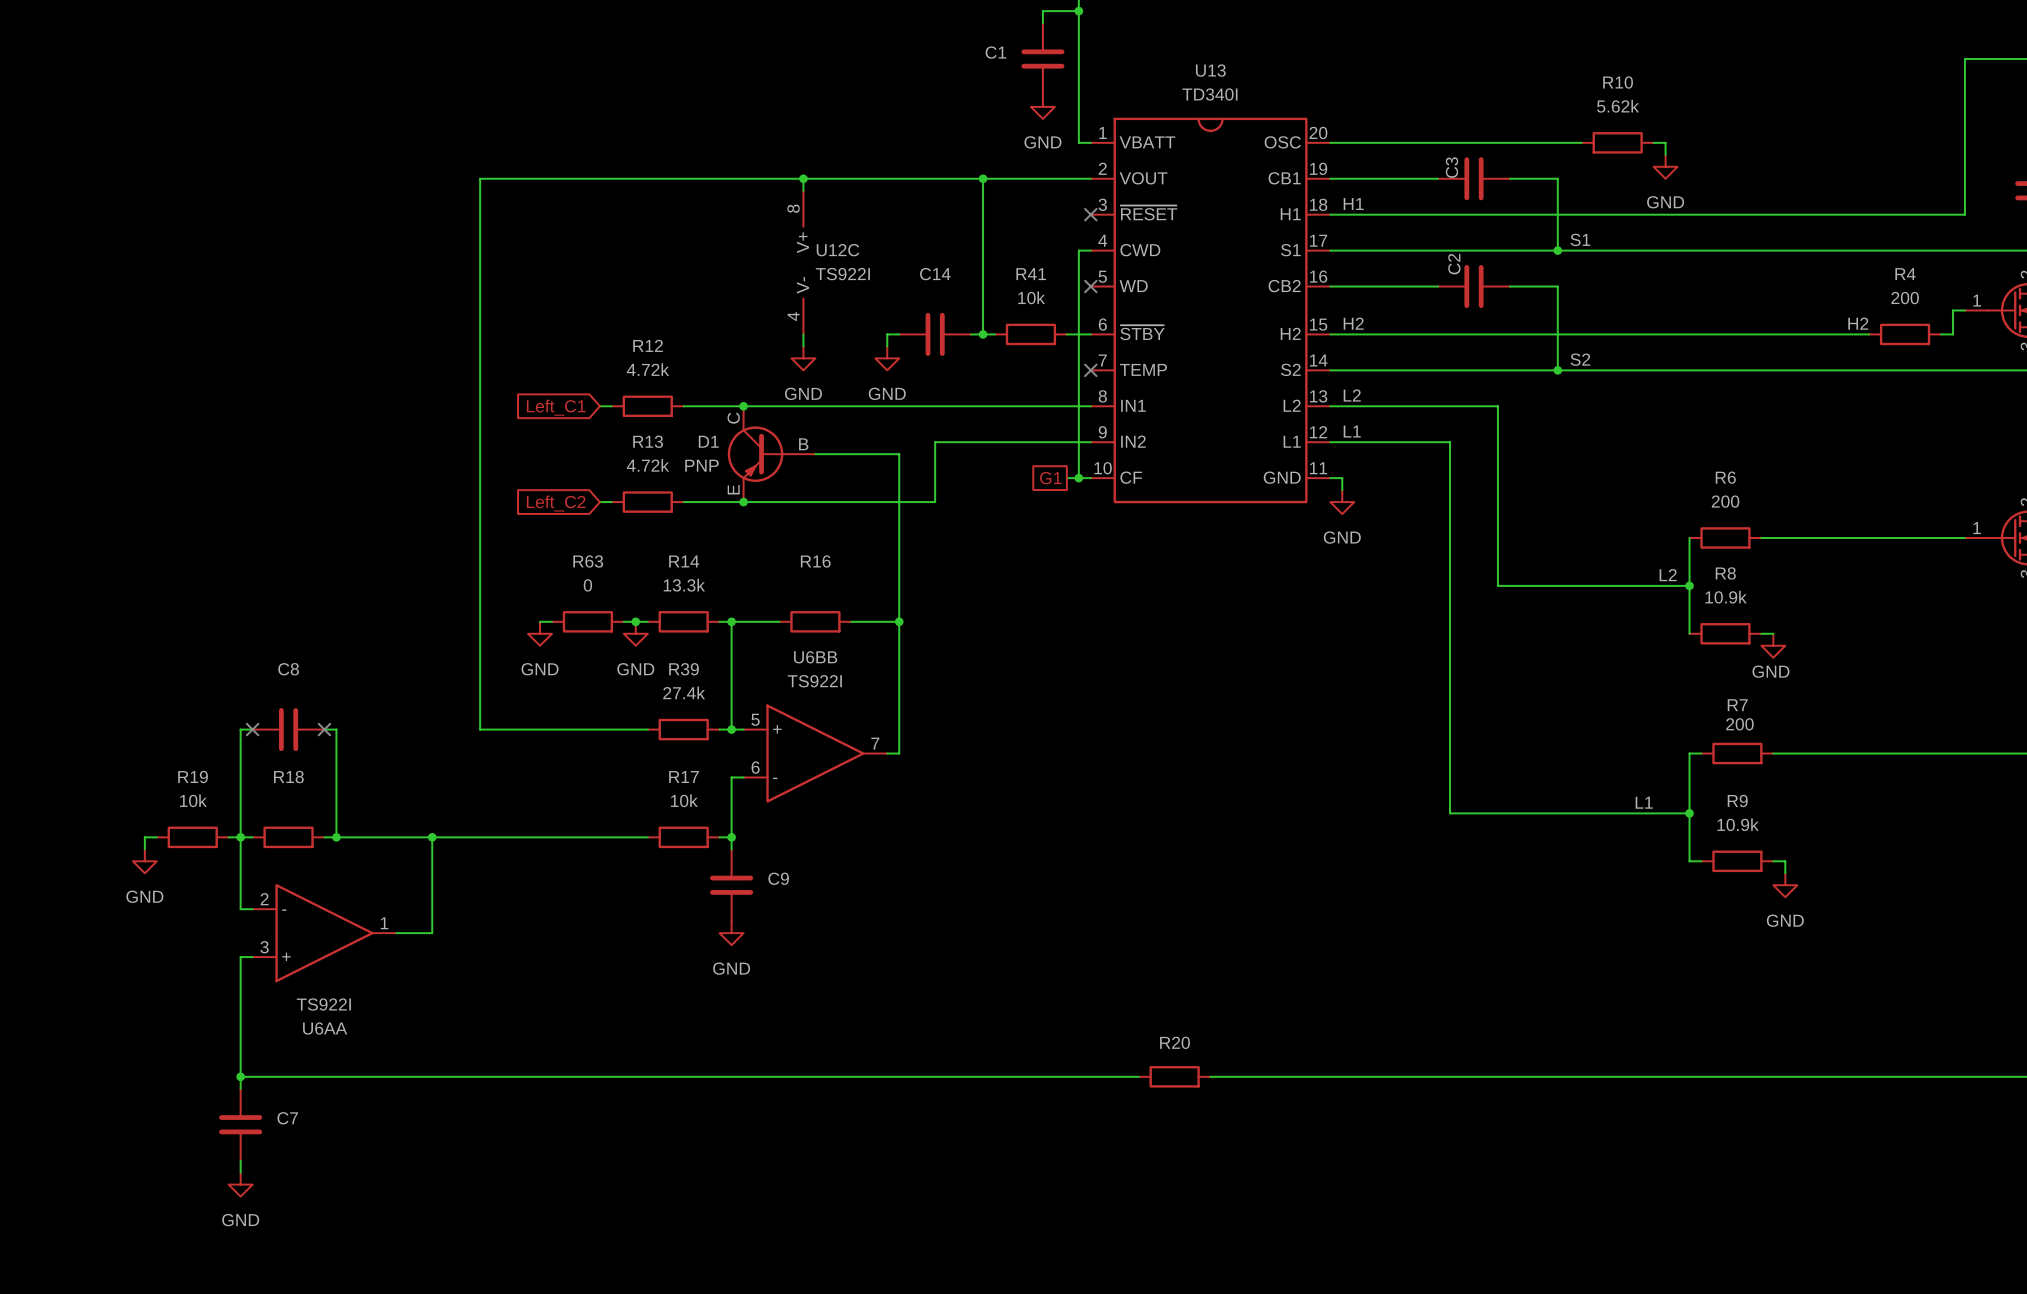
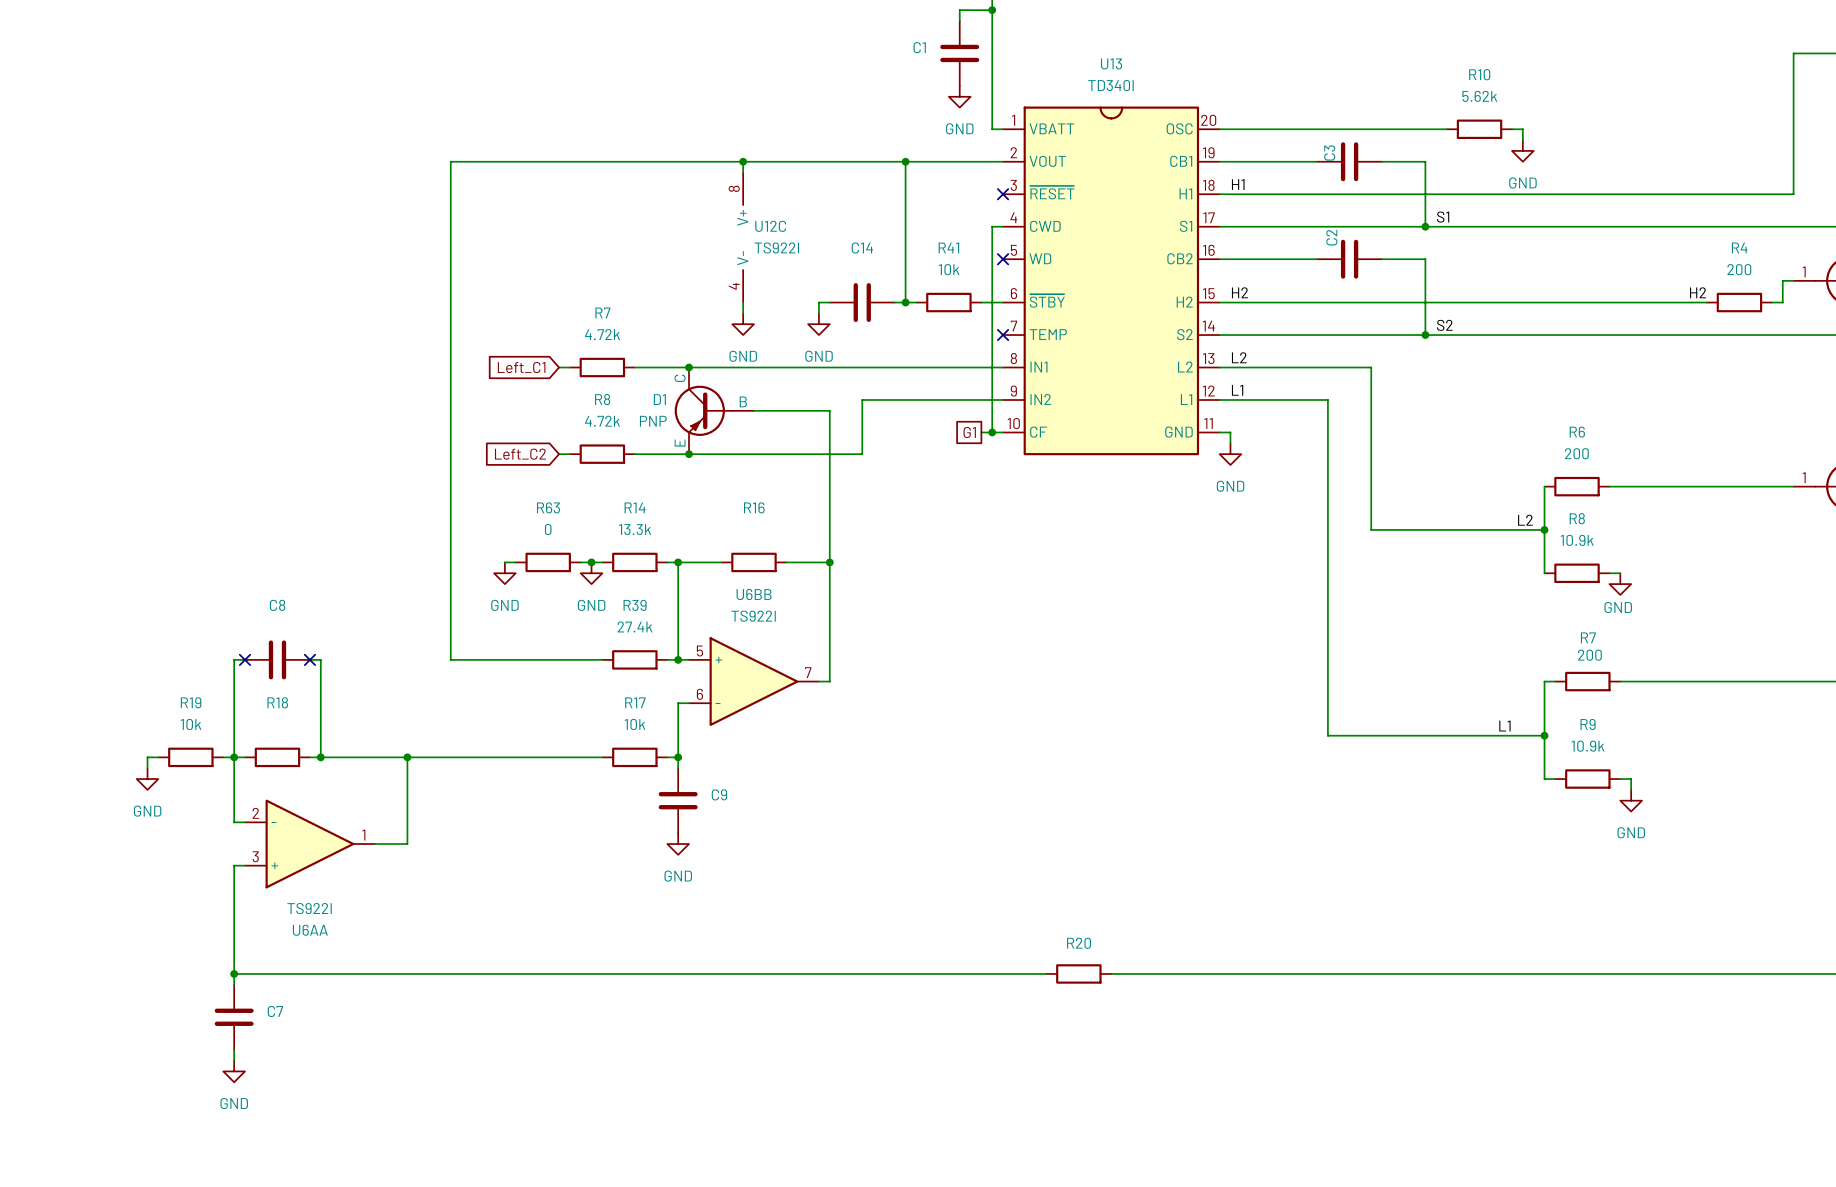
R12 name: R12 (648, 345) -> R7 (602, 312)
R13 name: R13 (648, 441) -> R8 (602, 399)

